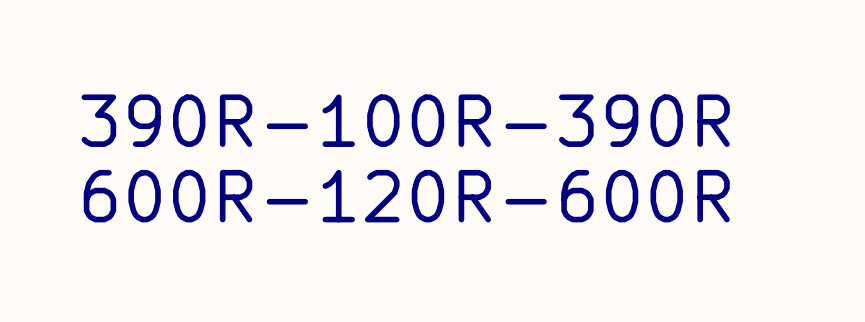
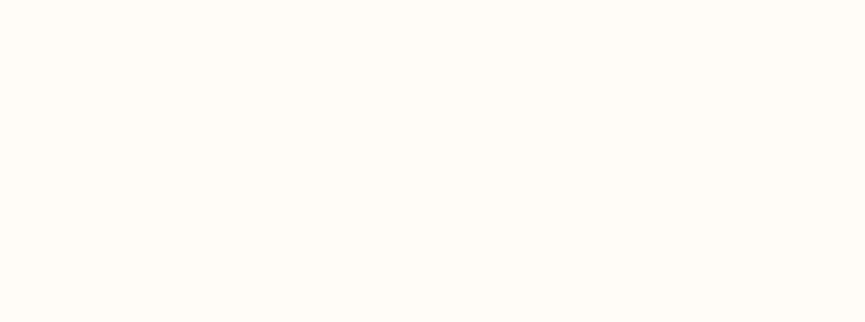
text: 390R-100R-390R (405, 120) -> none
text: 600R-120R-600R (406, 196) -> none

